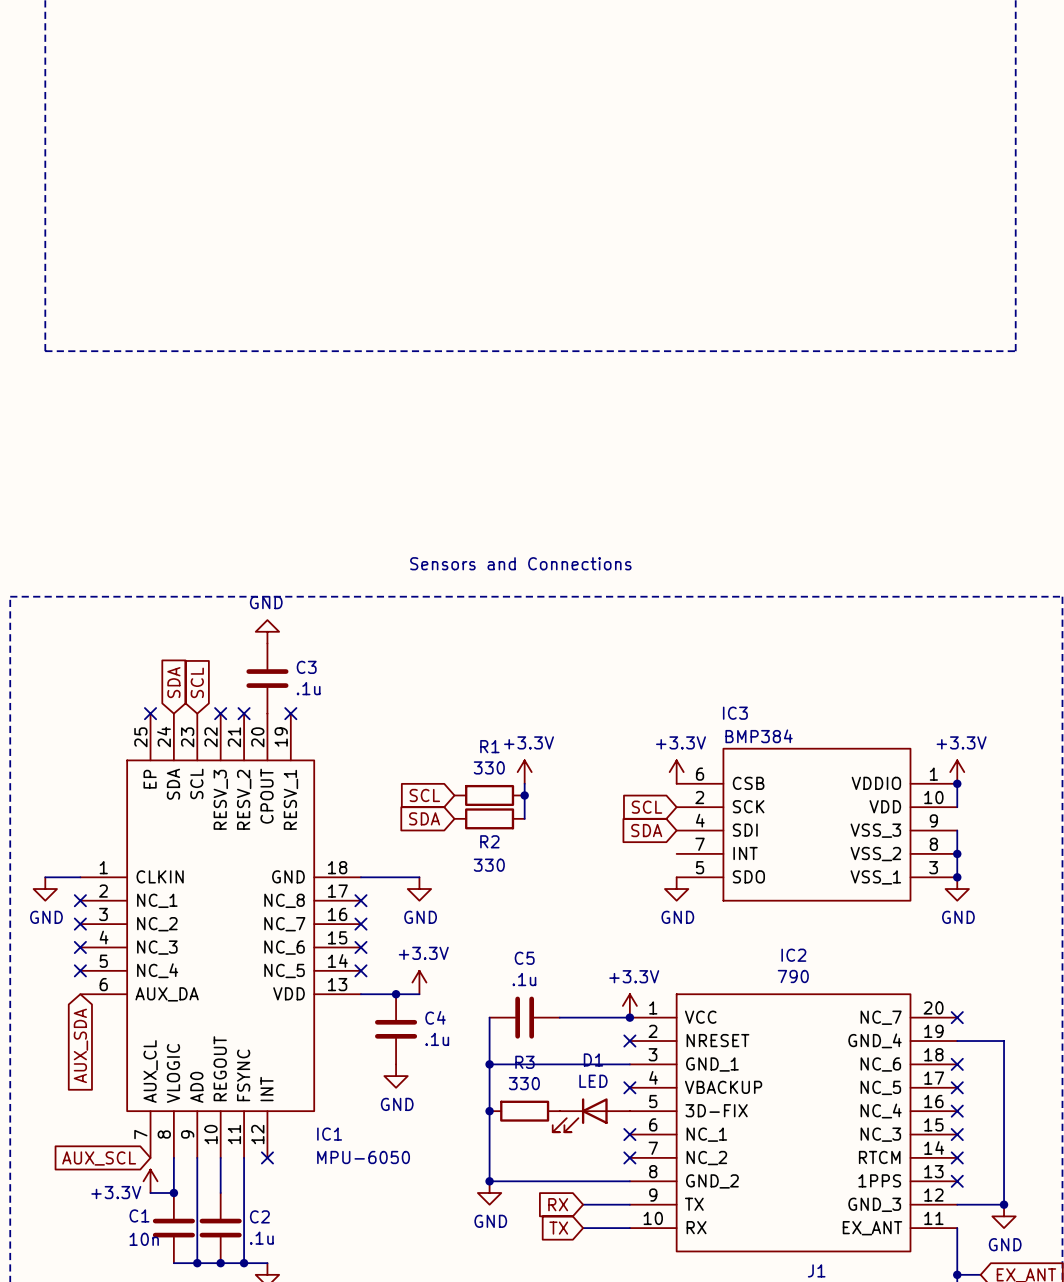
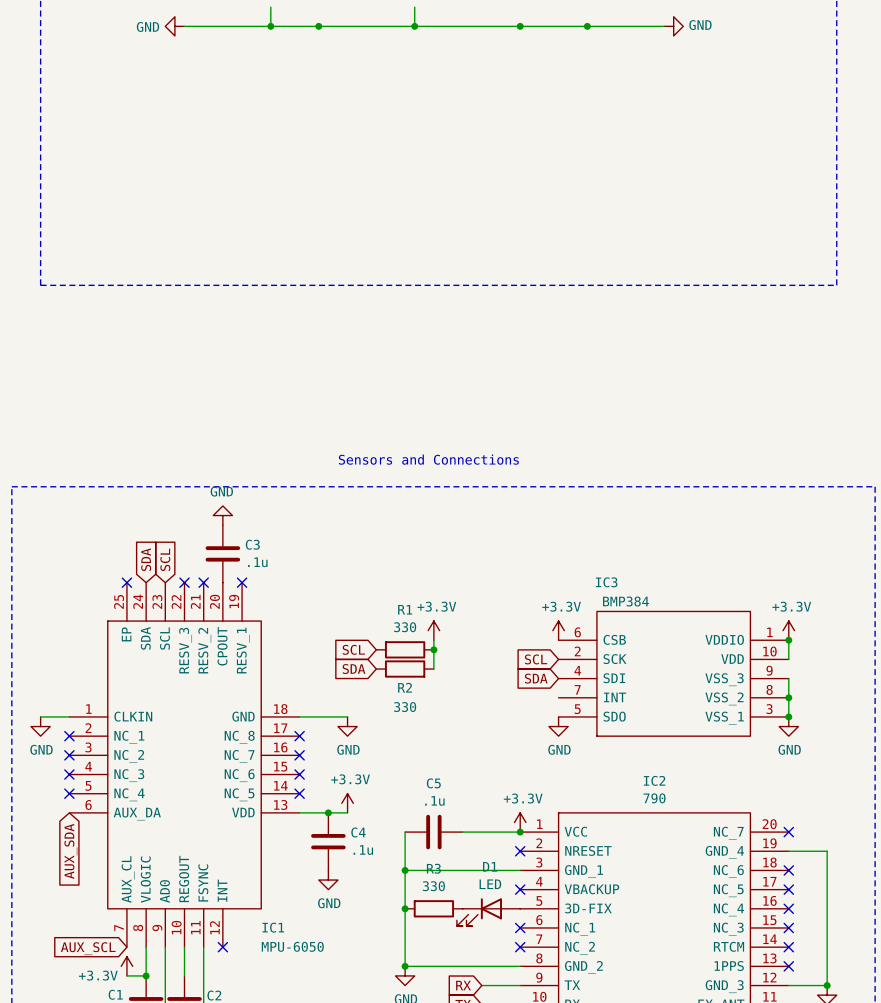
wire: none -> (270, 7) (270, 26)
wire: none -> (414, 7) (414, 26)
power symbol: none -> GND (174, 26)
wire: none -> (184, 26) (664, 26)
junction: none -> (270, 26)
junction: none -> (318, 26)
junction: none -> (414, 26)
junction: none -> (520, 26)
junction: none -> (587, 26)
power symbol: none -> GND (673, 26)

